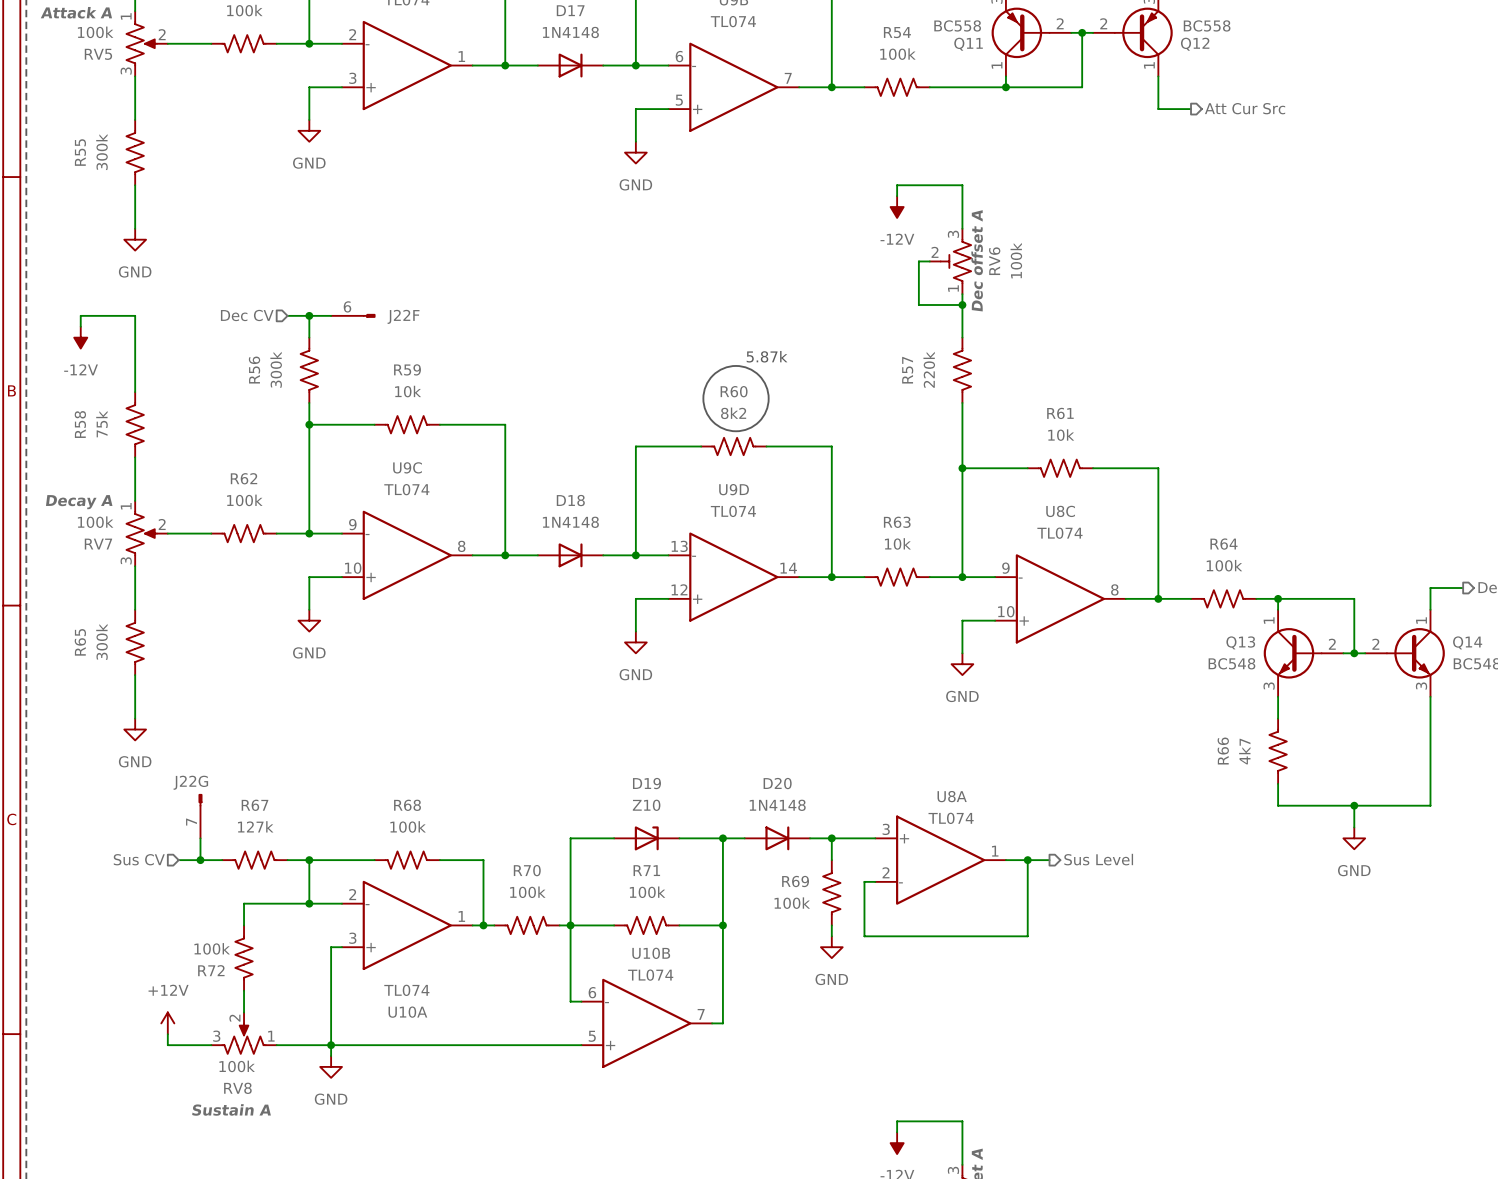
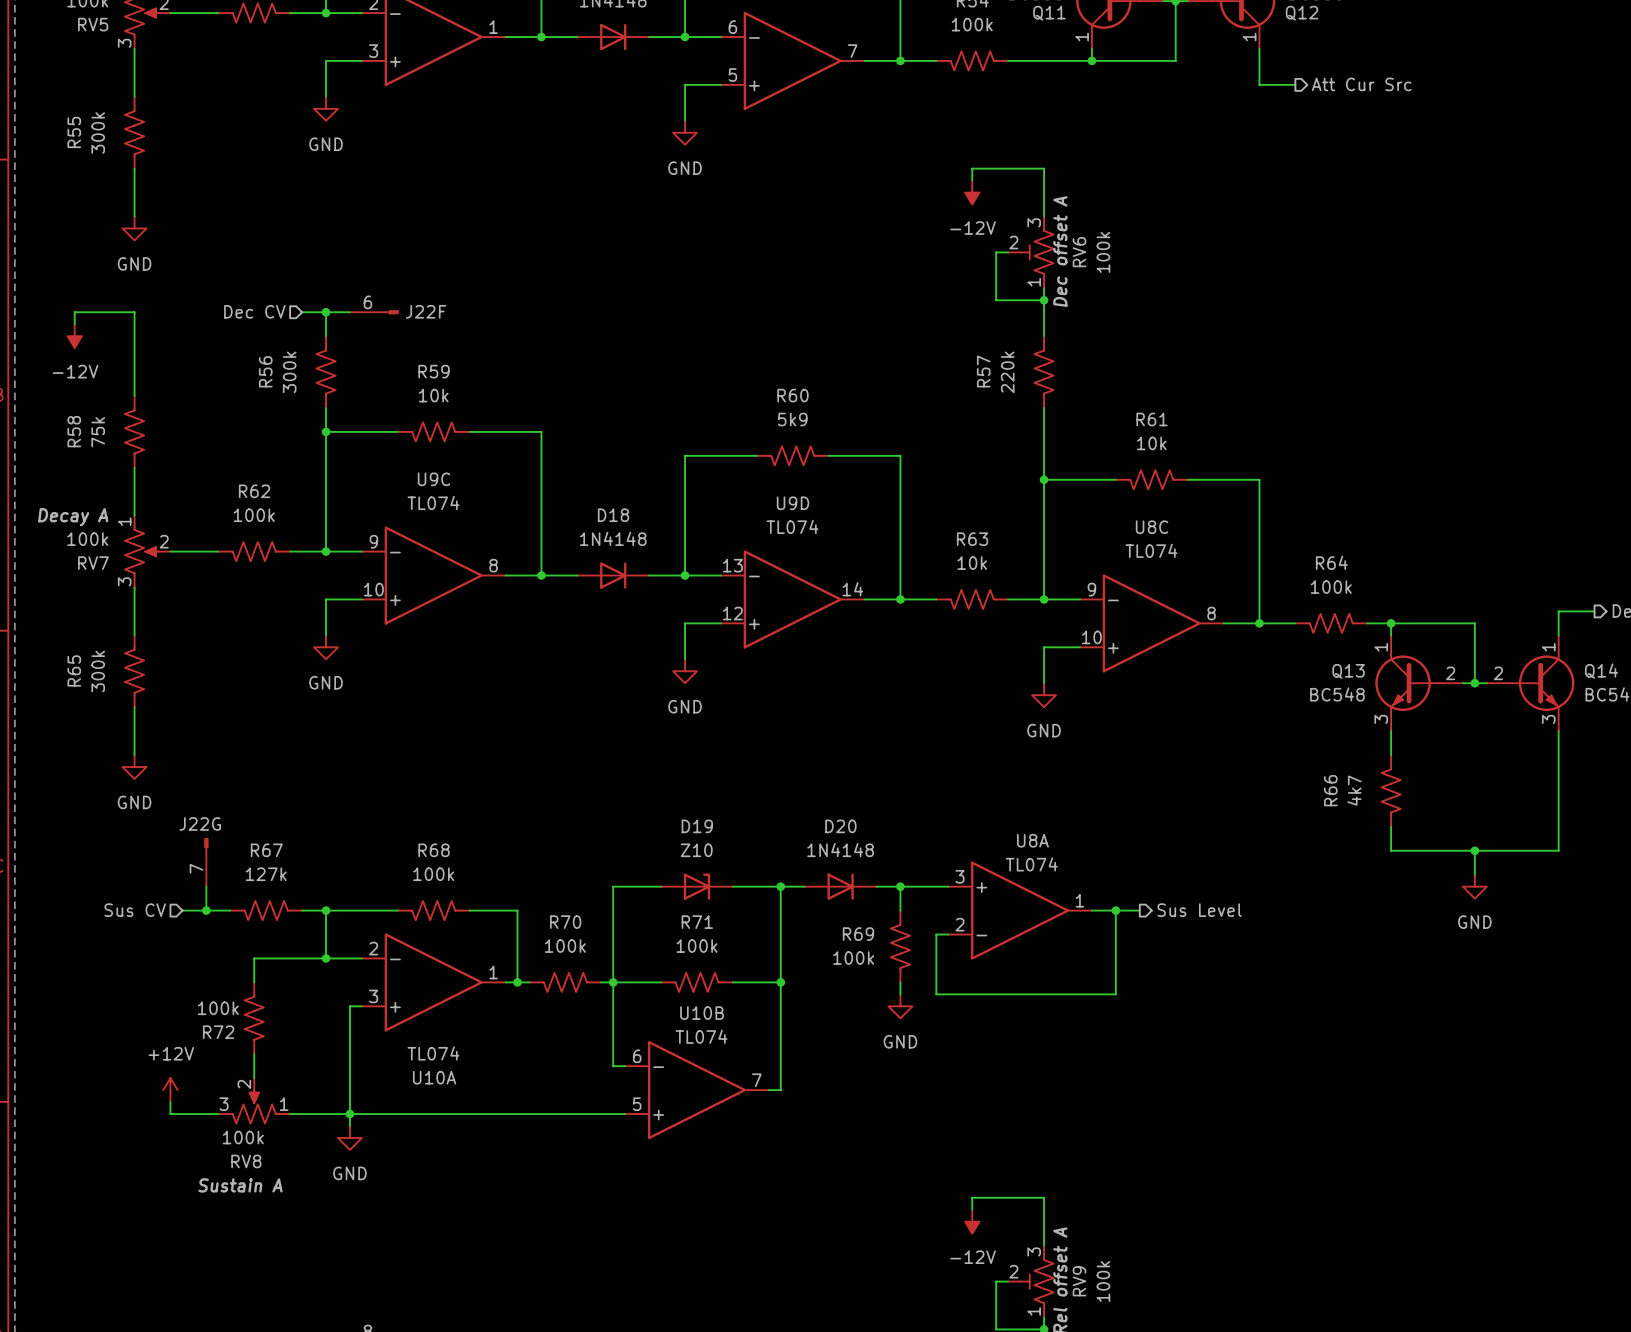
text: 5.87k (767, 356) -> none
drawing: [703, 365, 769, 432] -> none
R60 value: 8k2 (733, 413) -> 5k9 (792, 419)

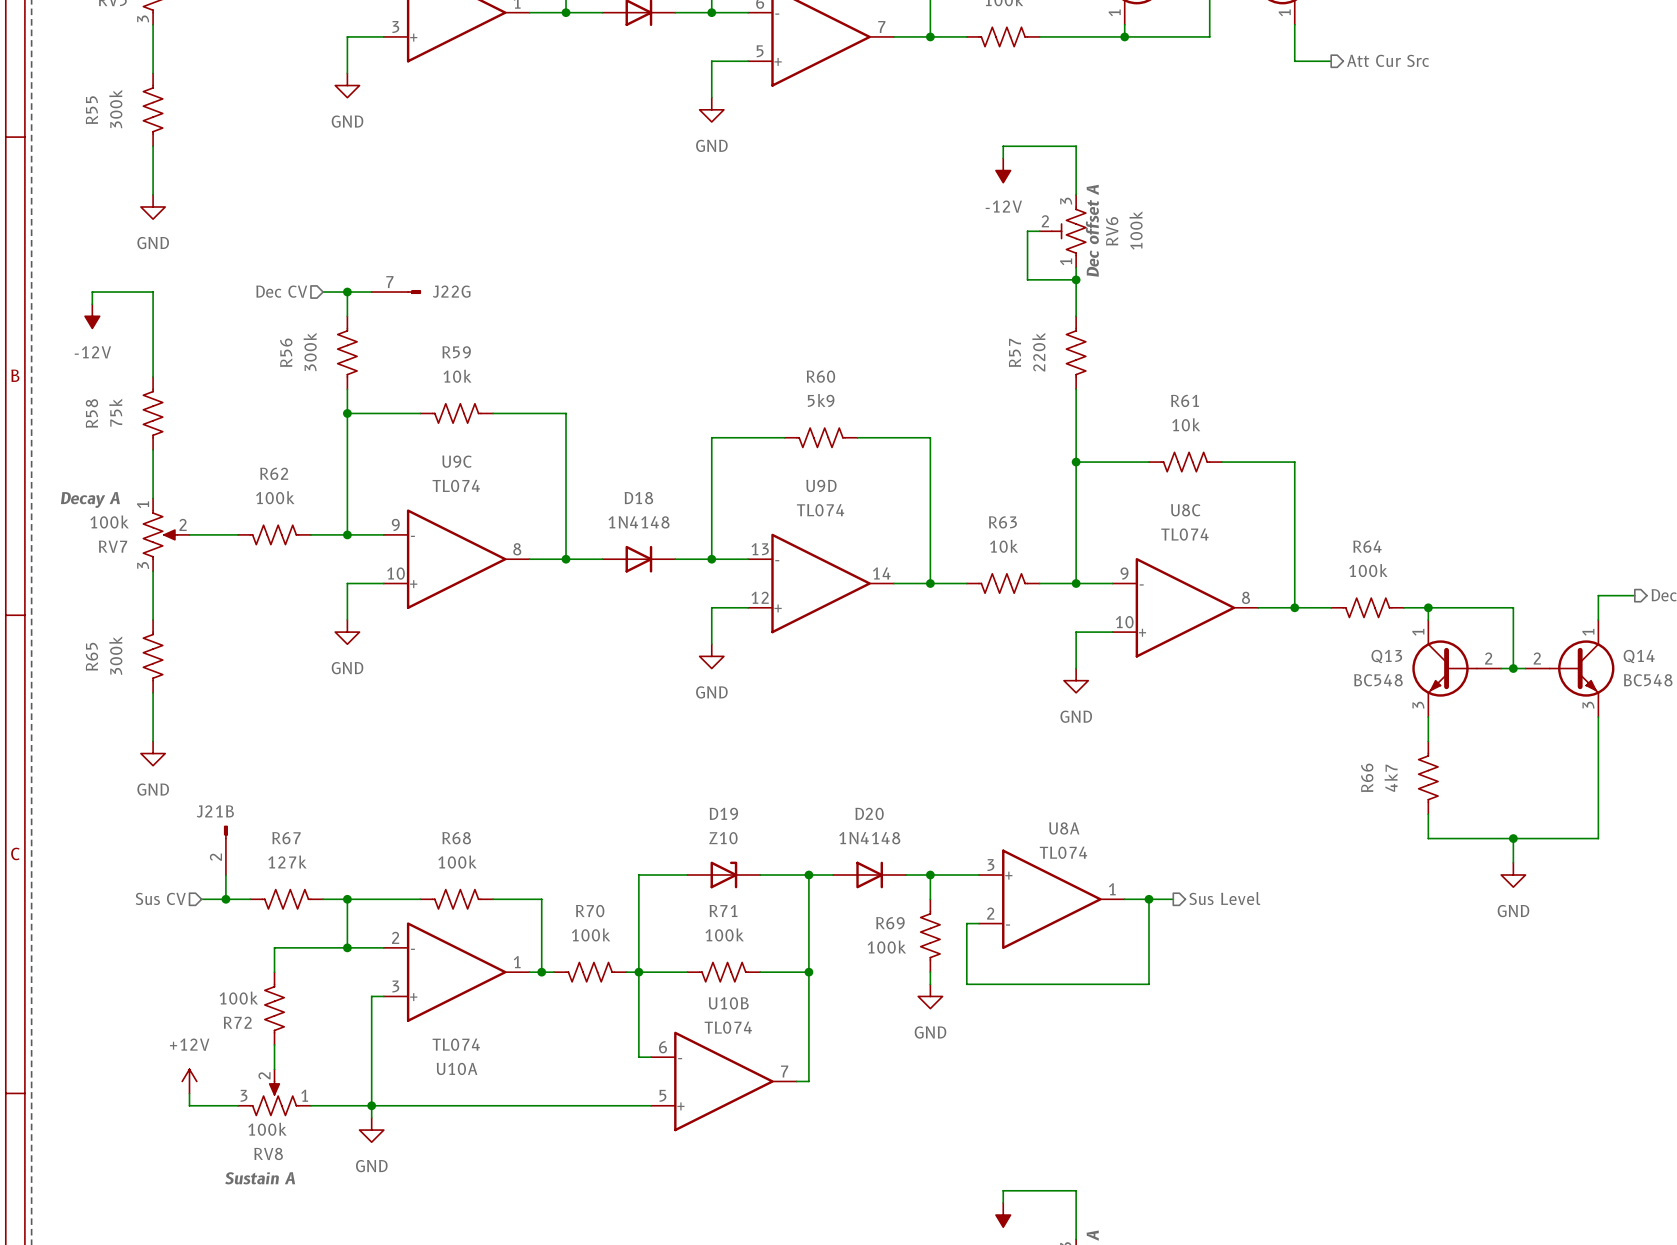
J22F: (374, 312) -> none
J22G rotation: 0° (206, 844) -> 90° clockwise (414, 292)
J22G position: (206, 862) -> (396, 292)
J21B: none -> (225, 850)

